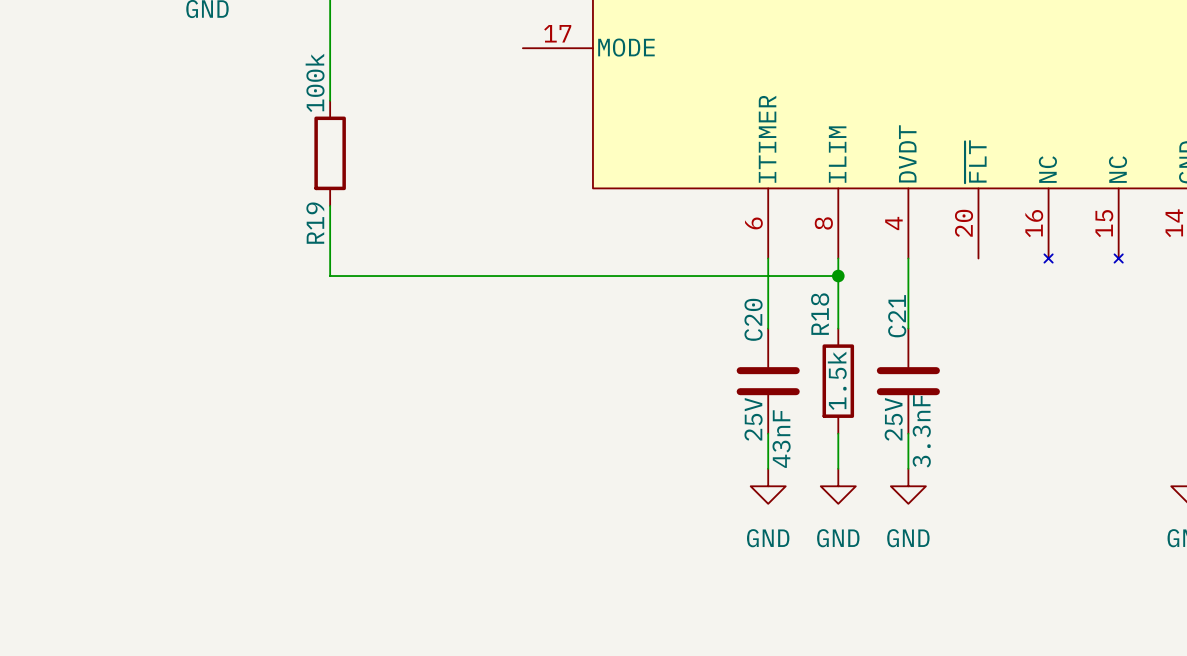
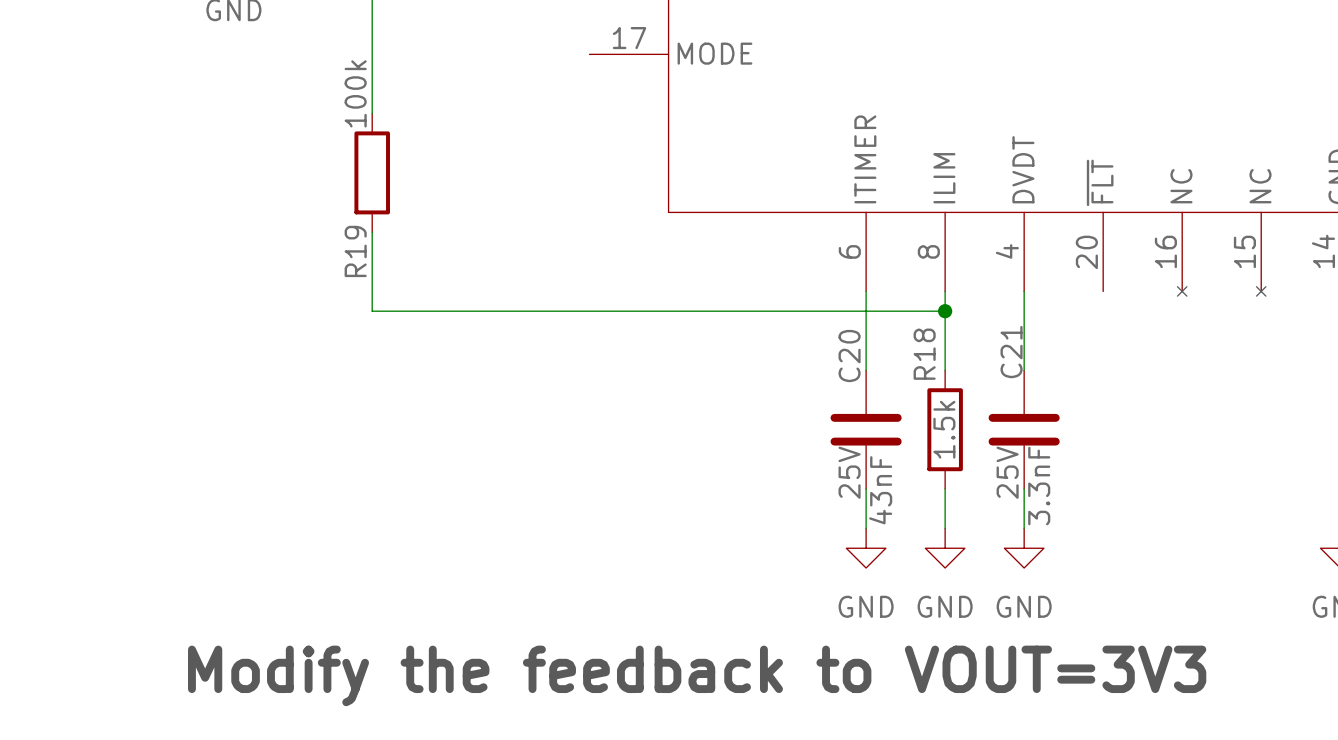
text: none -> Modify the feedback to VOUT=3V3 (697, 675)

